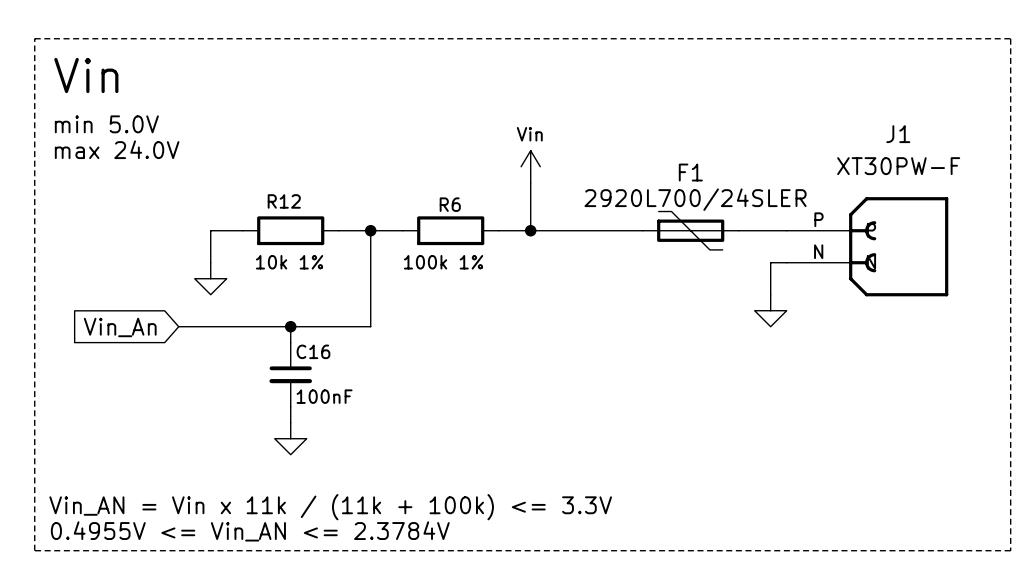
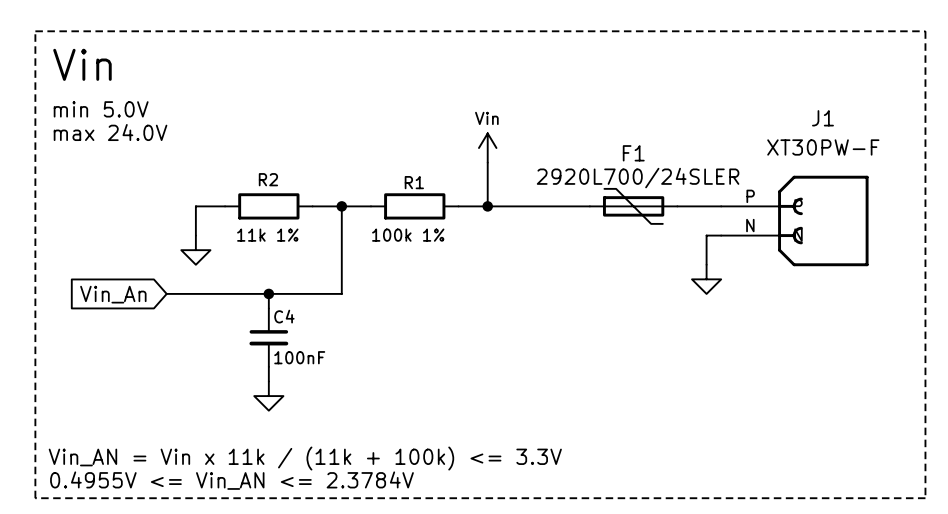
R12 name: R12 (284, 201) -> R2 (268, 179)
R6 name: R6 (450, 204) -> R1 (414, 182)
R12 value: 10k 1% (289, 262) -> 11k 1% (267, 235)
C16 name: C16 (313, 351) -> C4 (284, 316)

